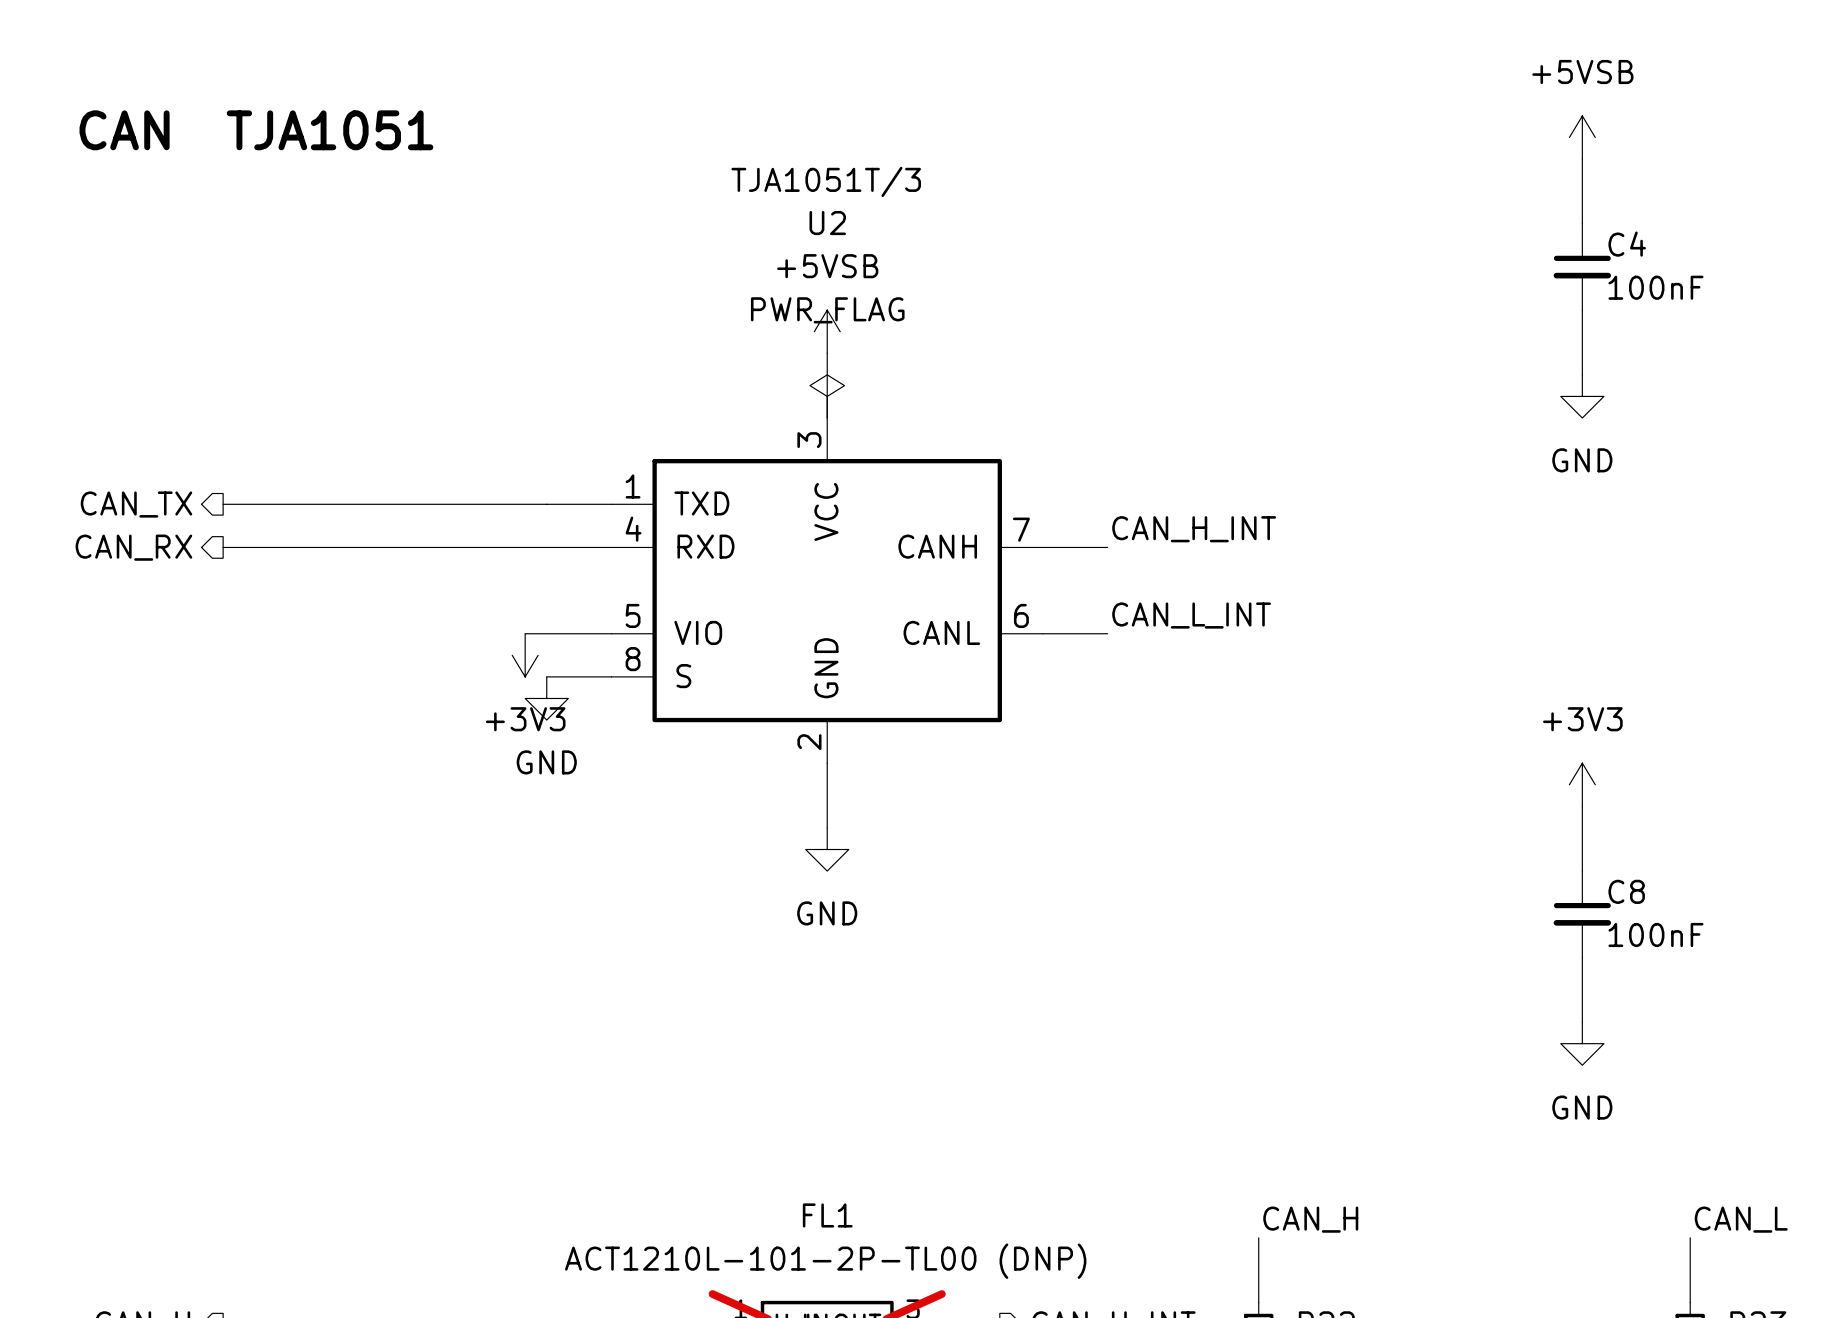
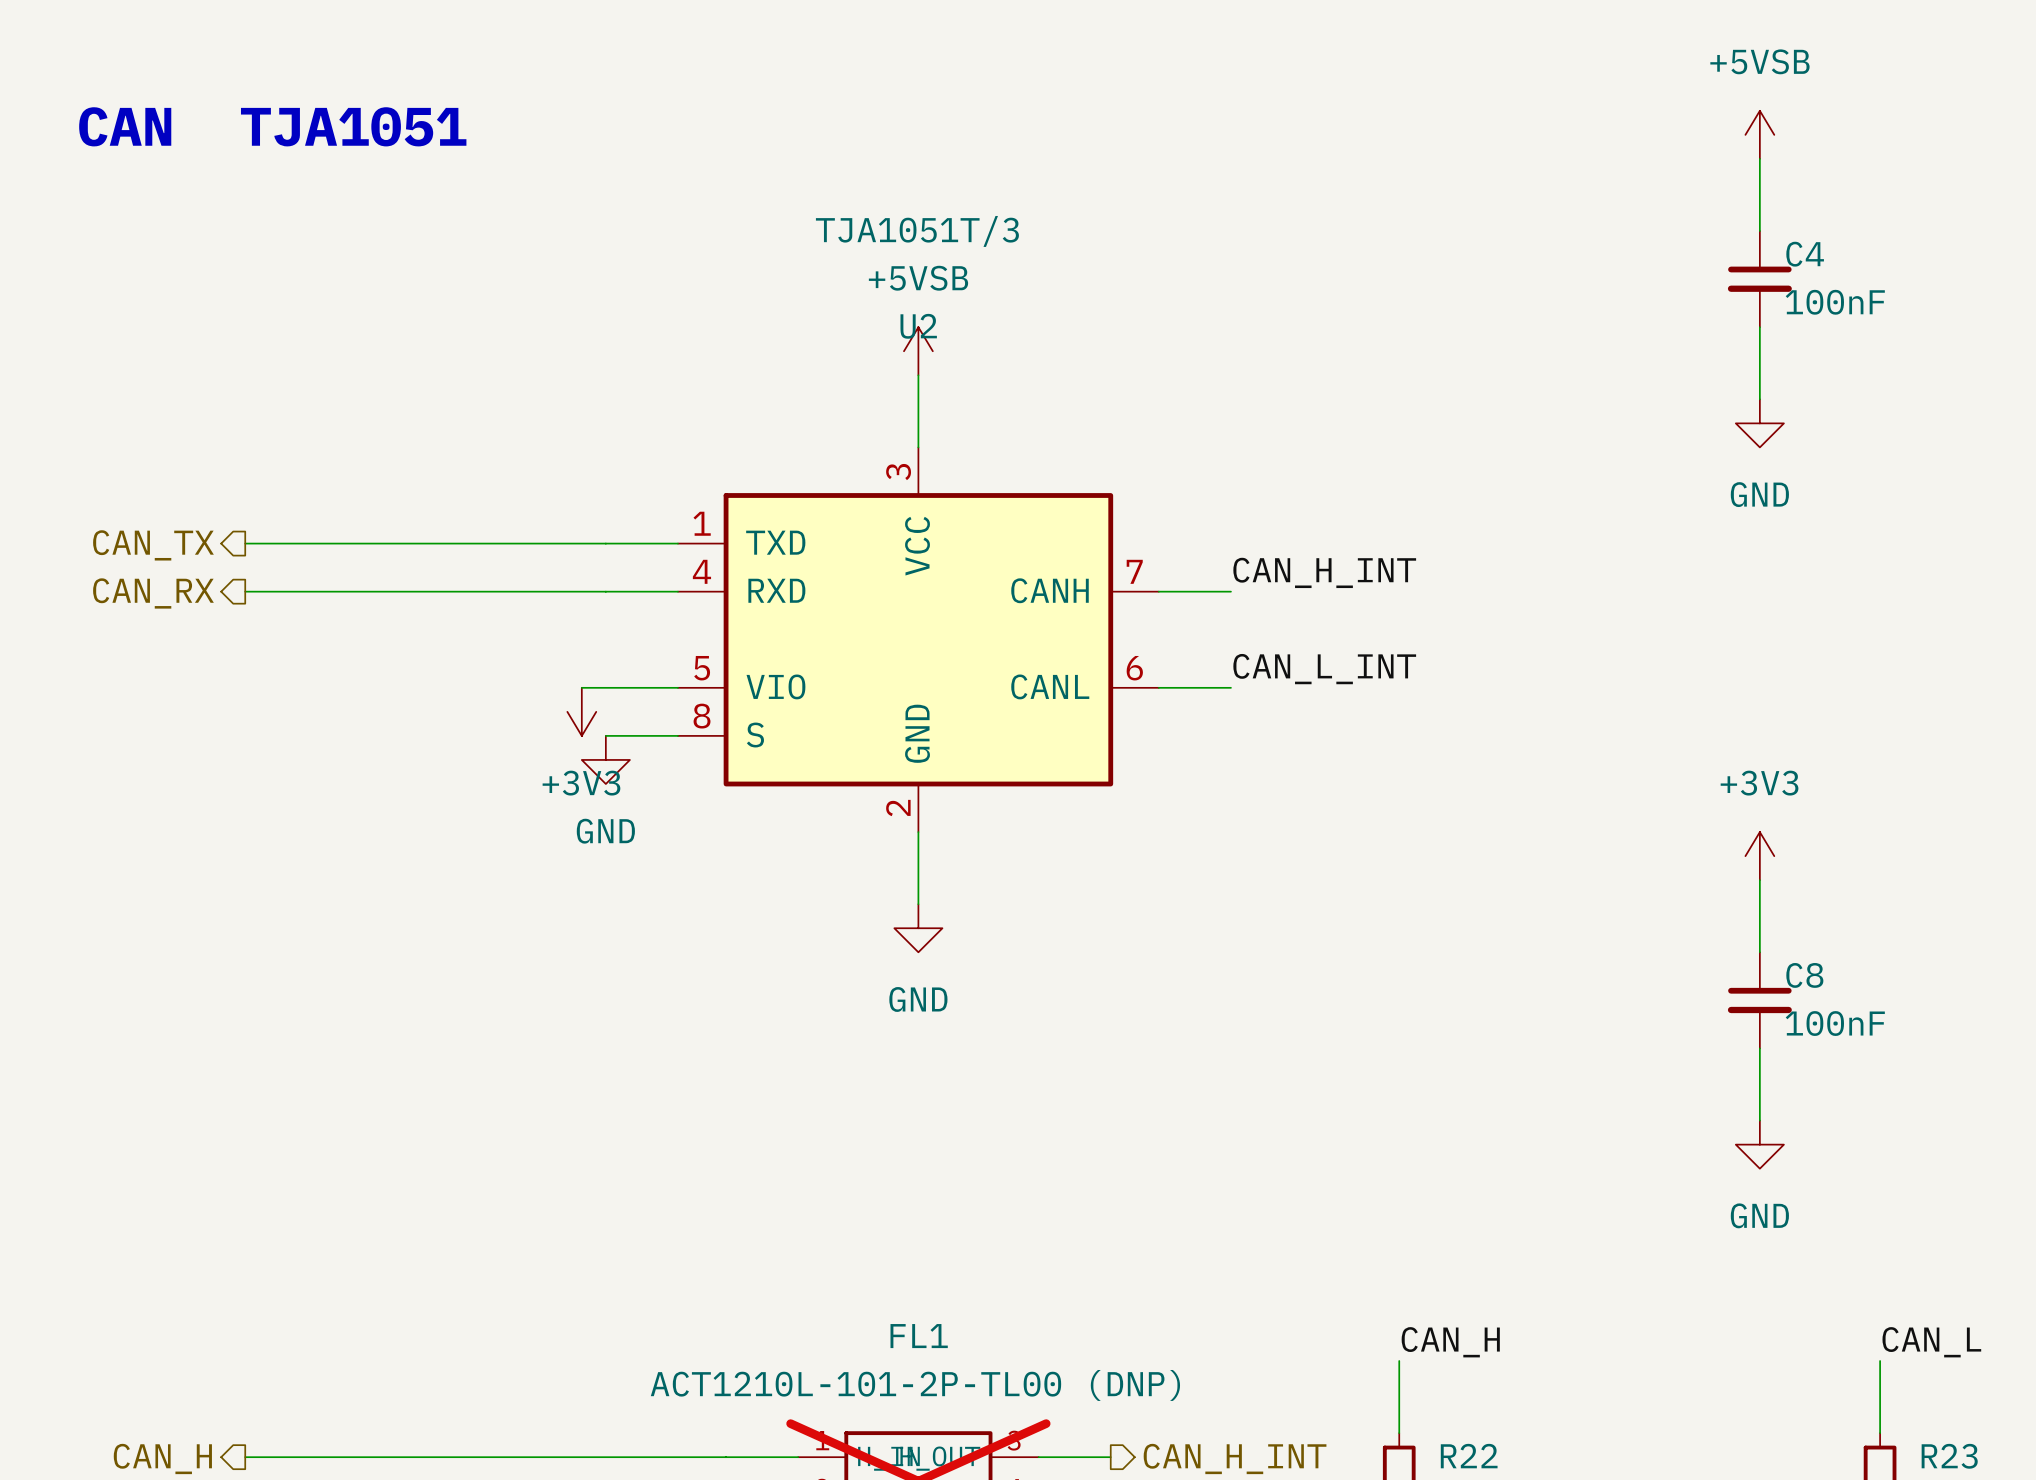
U2 value position: TJA1051T/3 (826, 181) -> TJA1051T/3 (917, 231)
U2 name position: U2 (827, 223) -> U2 (918, 326)
power symbol: PWR_FLAG (827, 396) -> none

